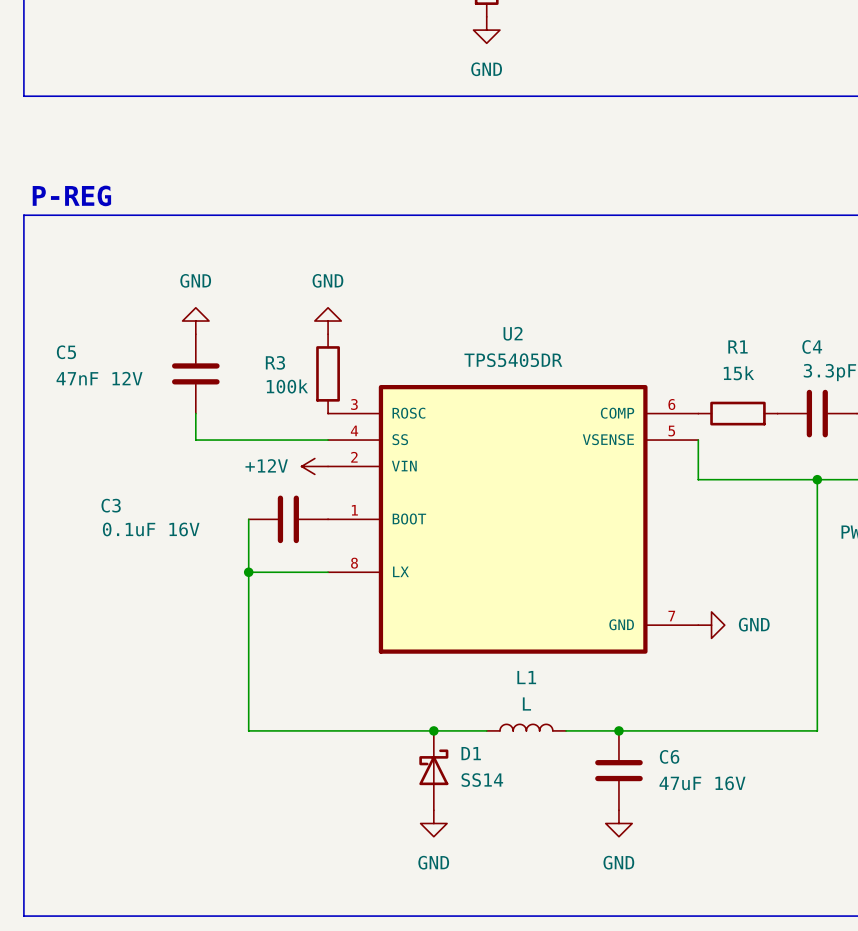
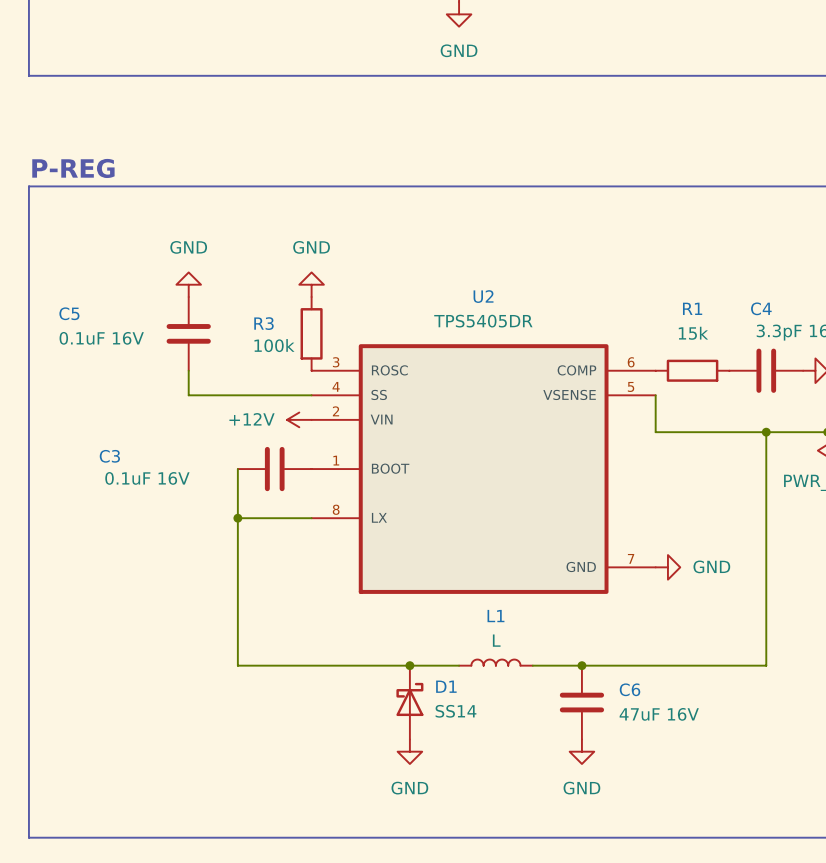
C5 value: 47nF 12V (99, 378) -> 0.1uF 16V (101, 338)

